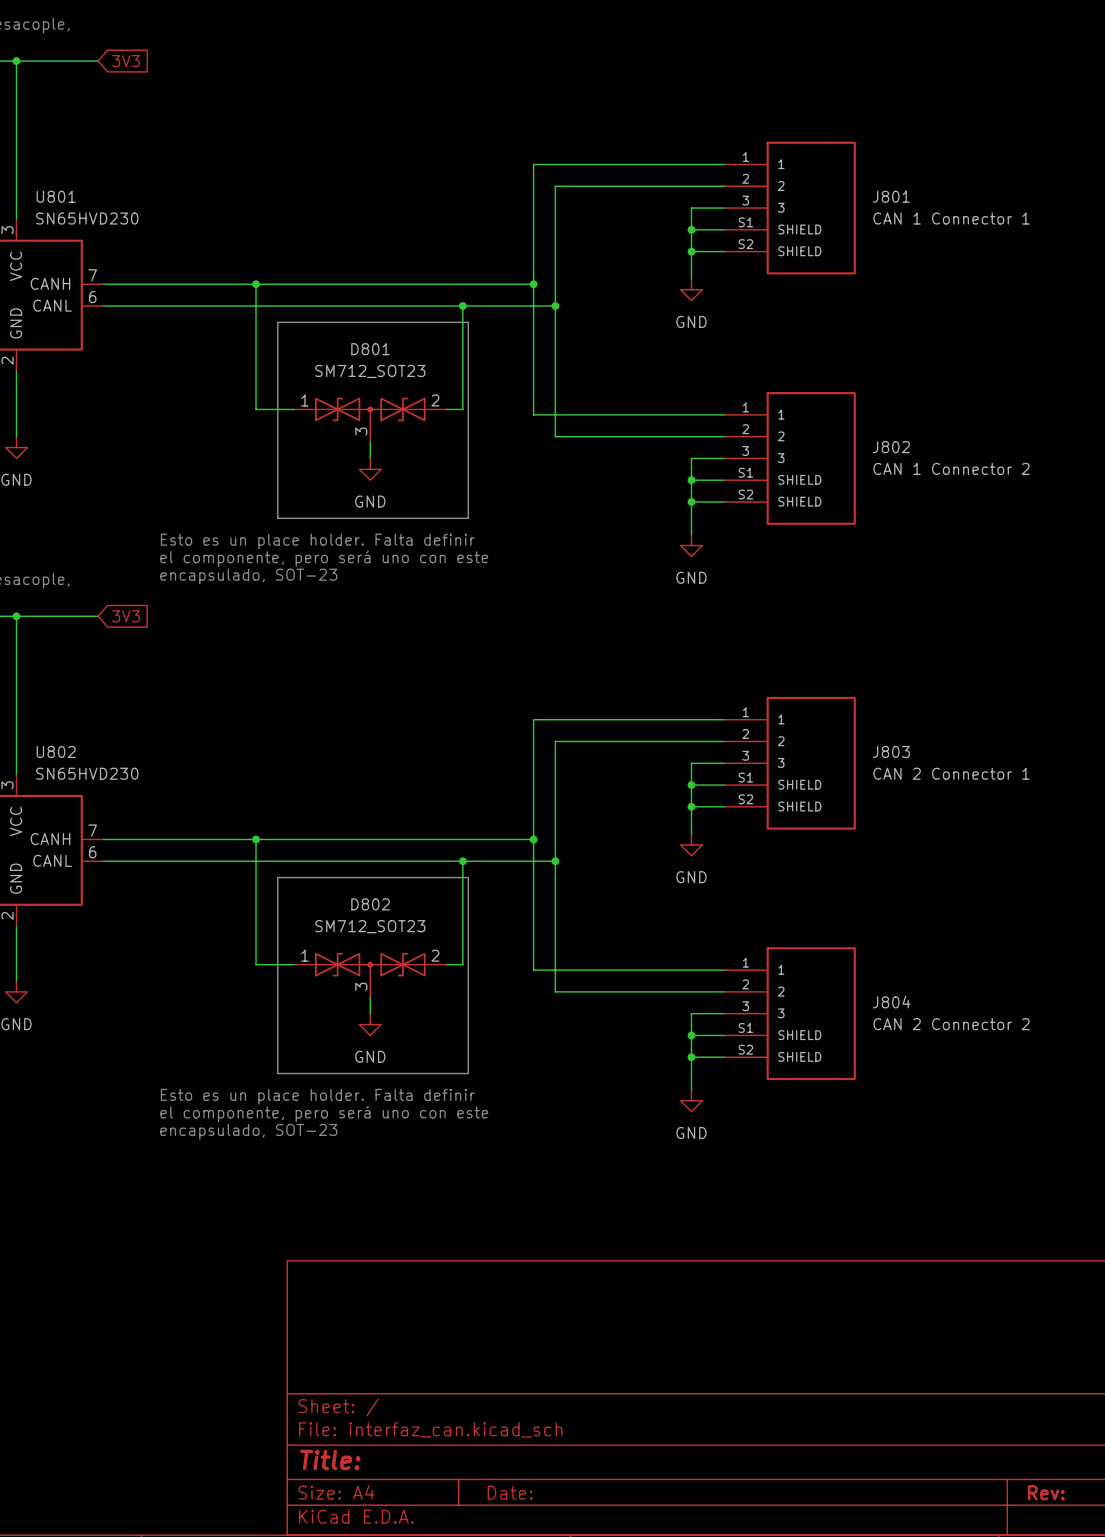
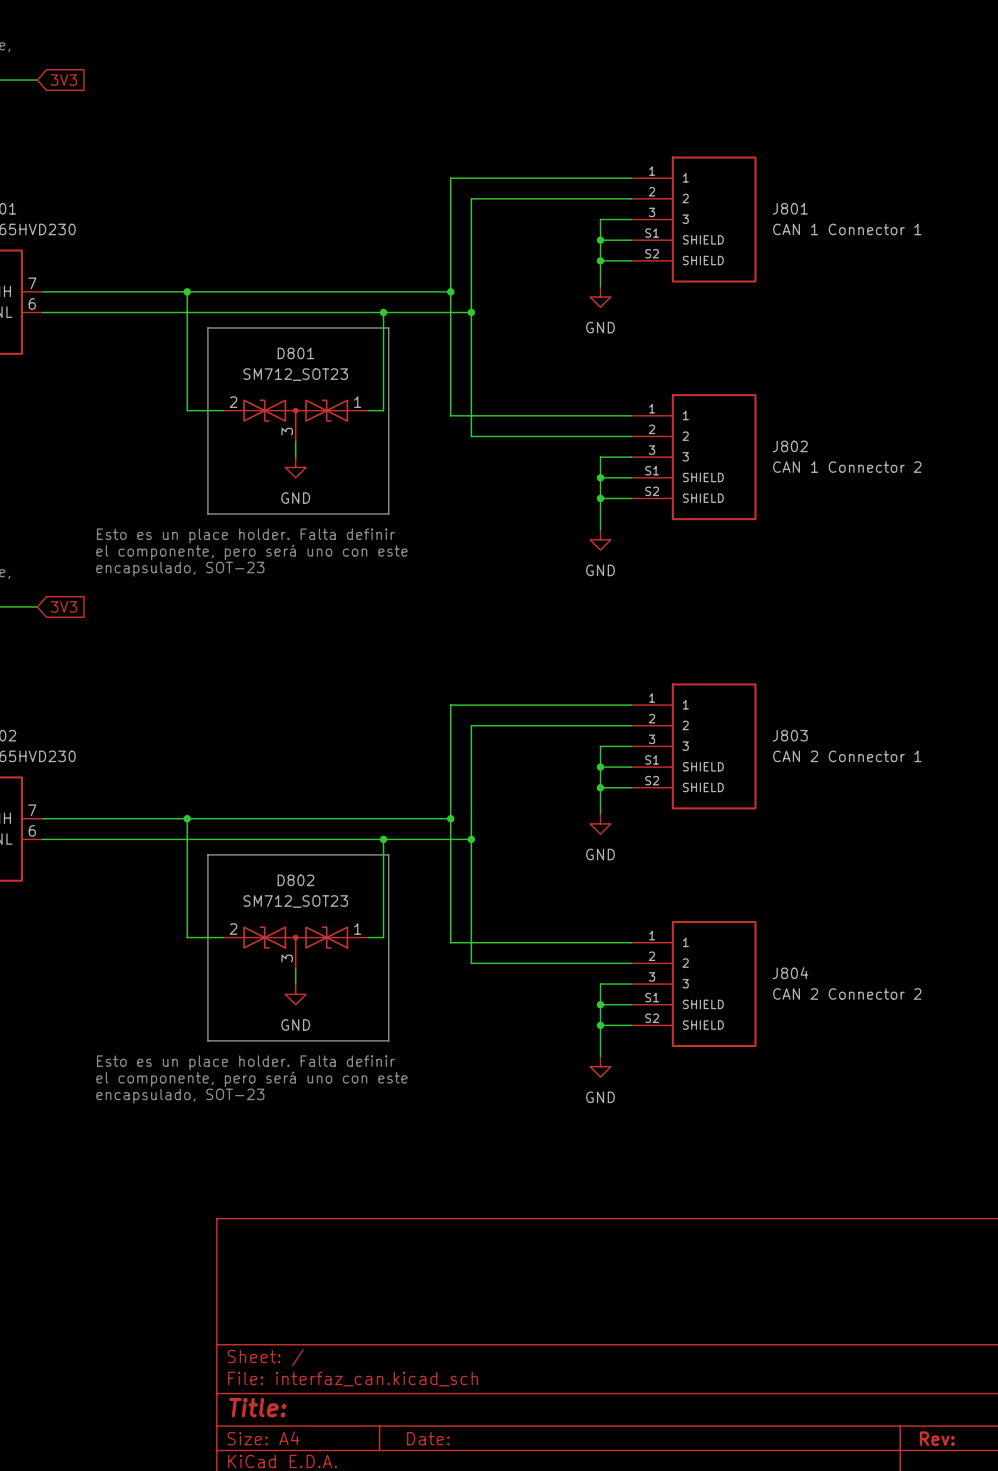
D801 flip: as is (370, 409) -> left-right (295, 410)
D802 flip: as is (370, 964) -> left-right (295, 937)

